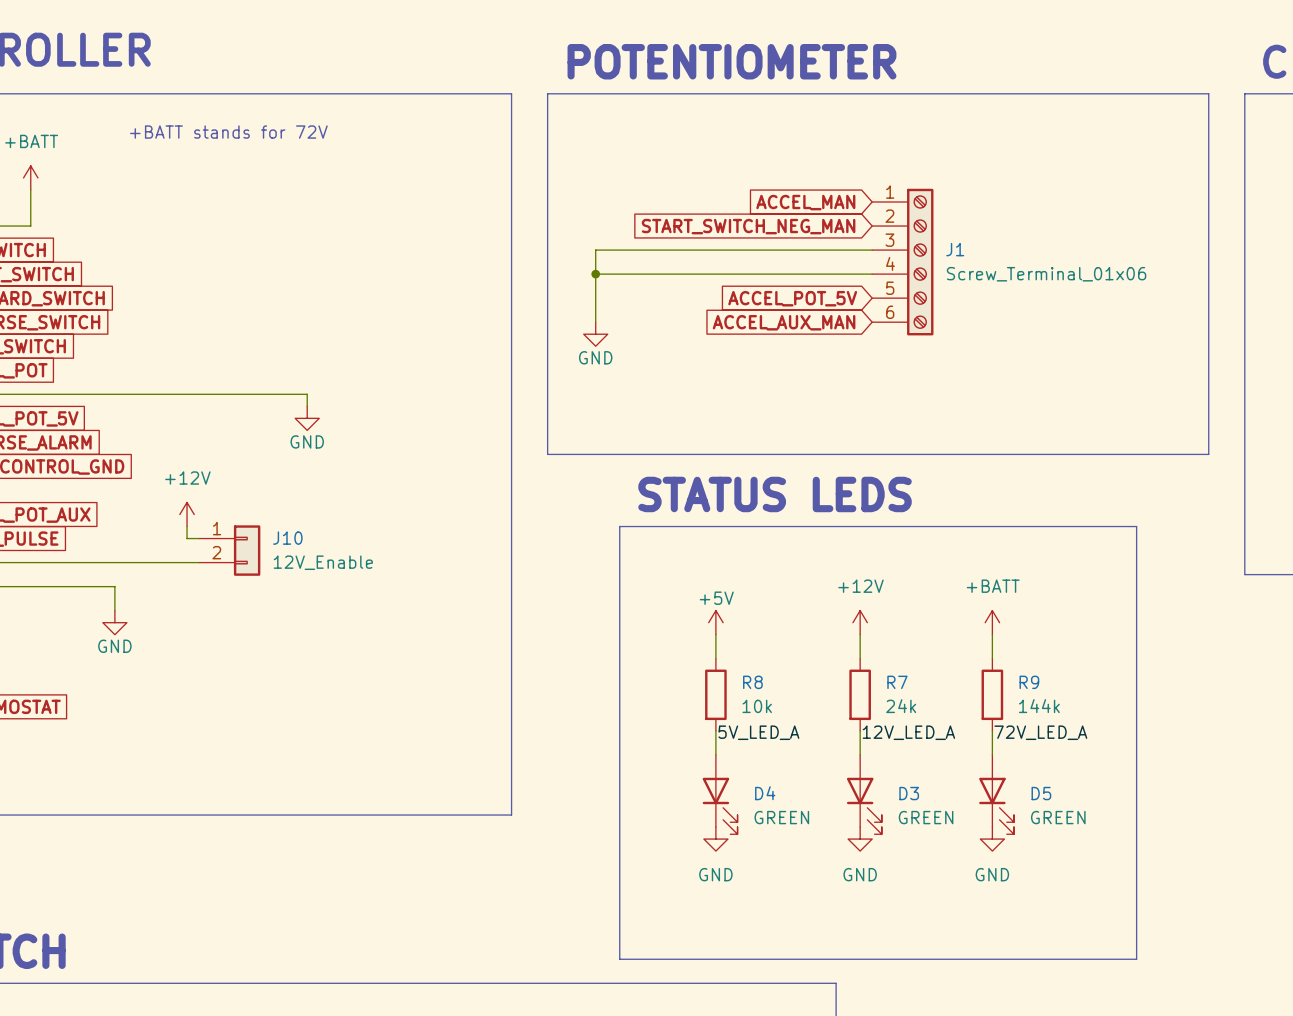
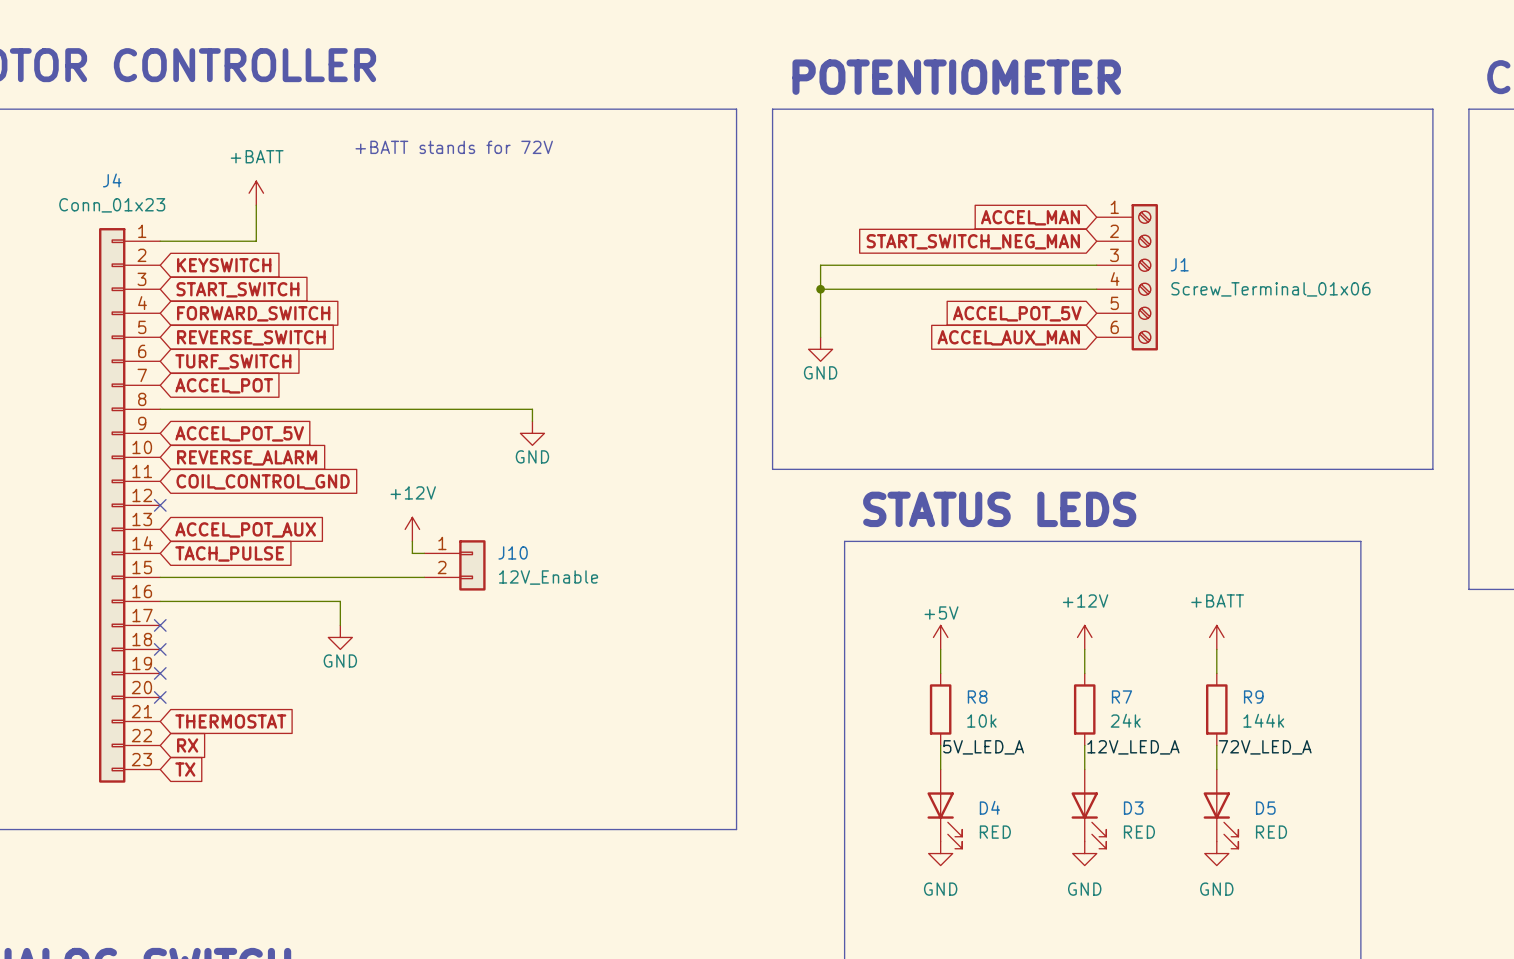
D4 value: GREEN (781, 817) -> RED (995, 832)
D3 value: GREEN (926, 817) -> RED (1139, 832)
D5 value: GREEN (1058, 817) -> RED (1271, 832)

